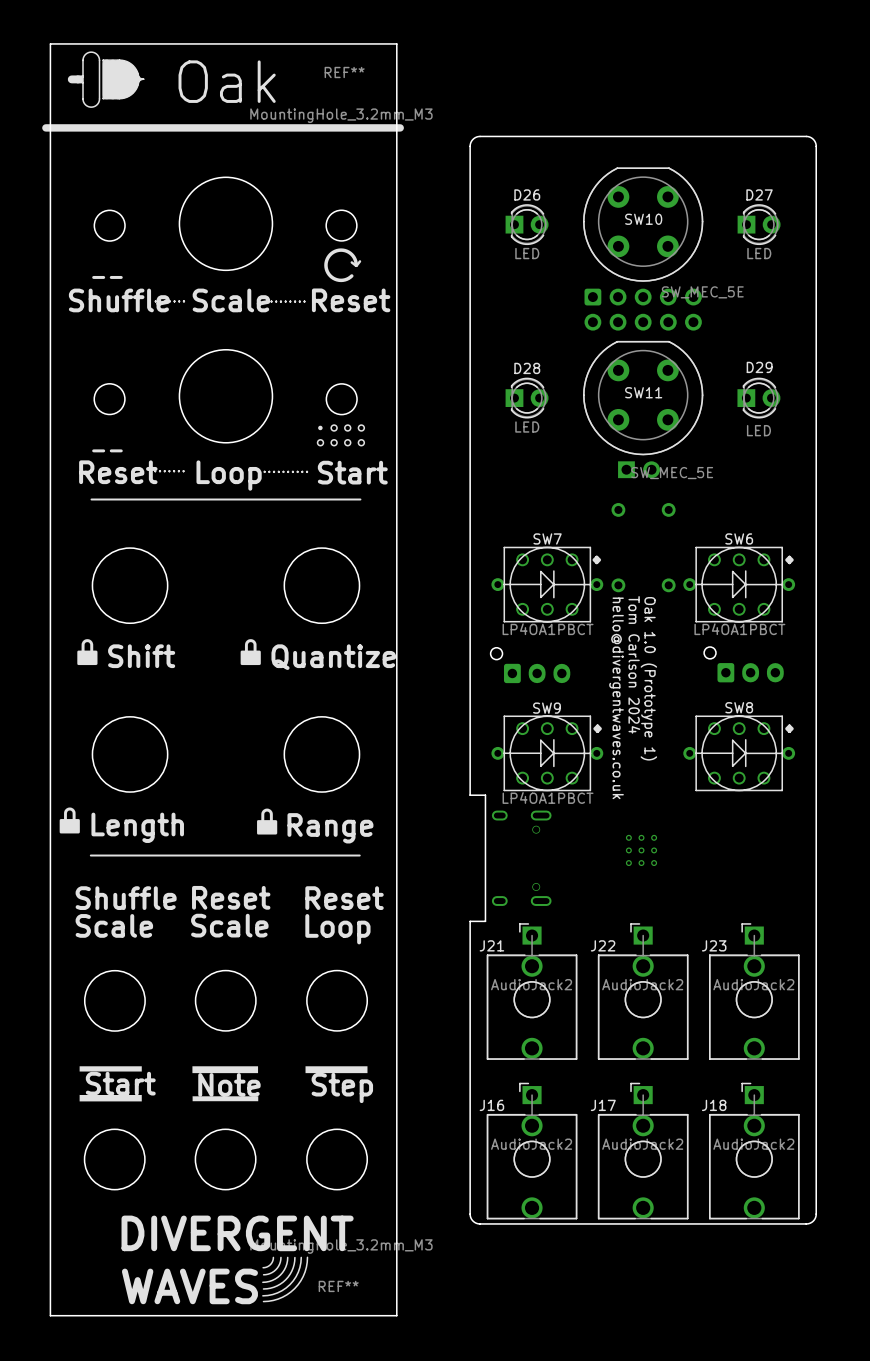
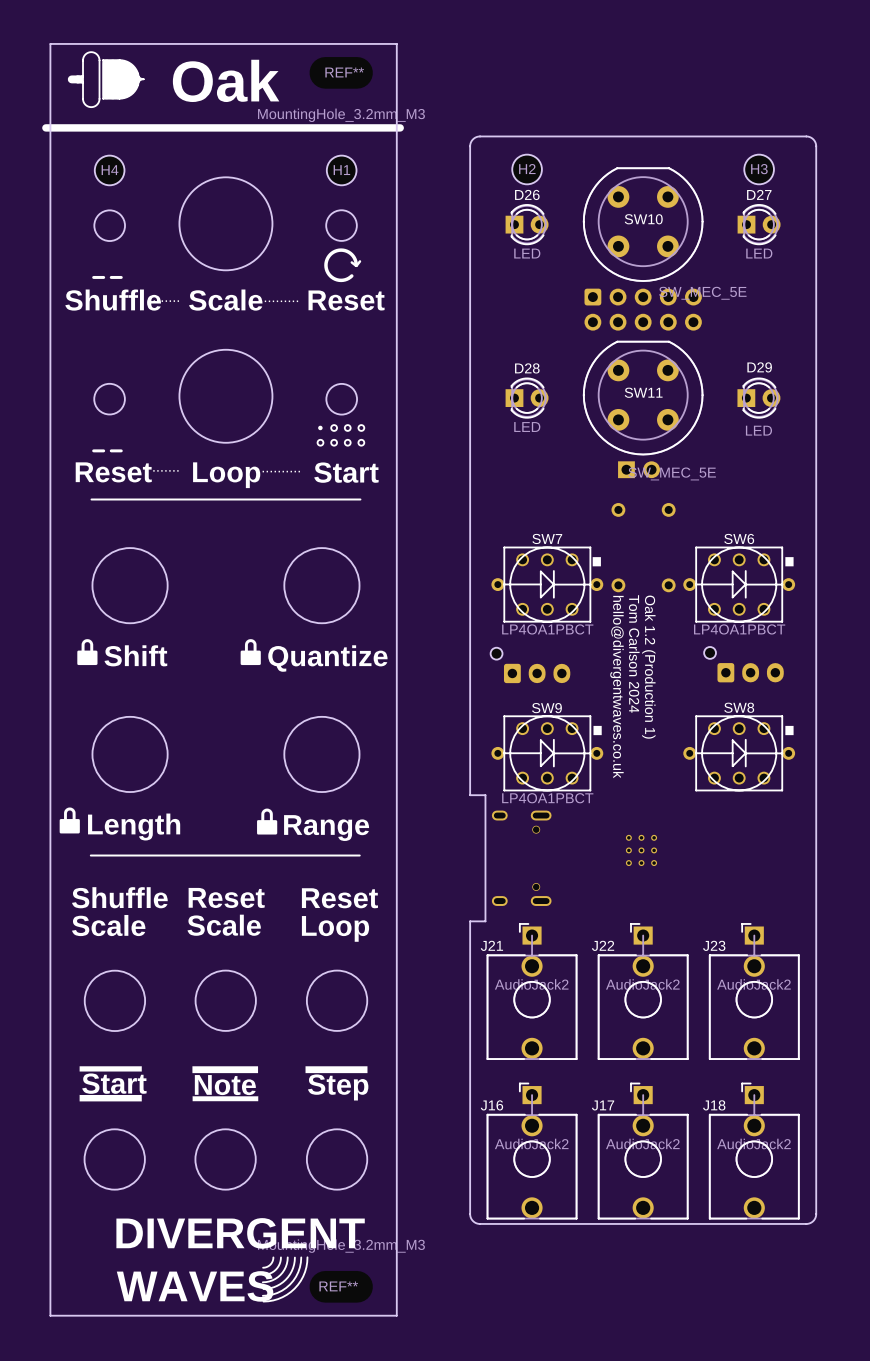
H2: none -> (527, 169)
H3: none -> (759, 169)
H4: none -> (109, 170)
H1: none -> (341, 170)
text: Oak 1.0 (Prototype 1) (648, 678) -> Oak 1.2 (Production 1) (648, 667)

